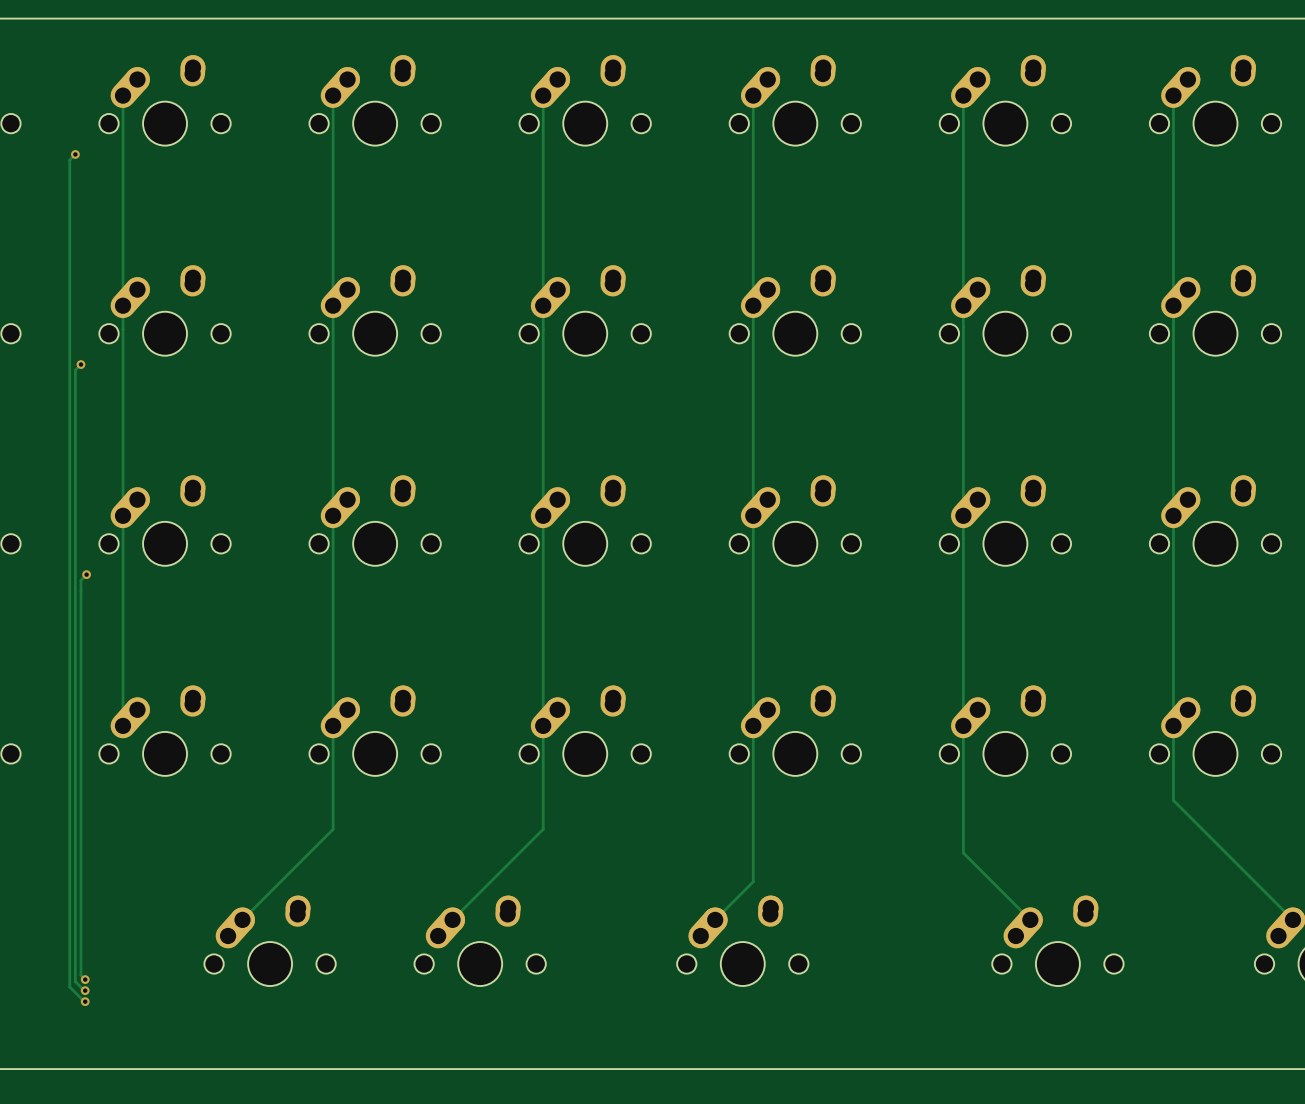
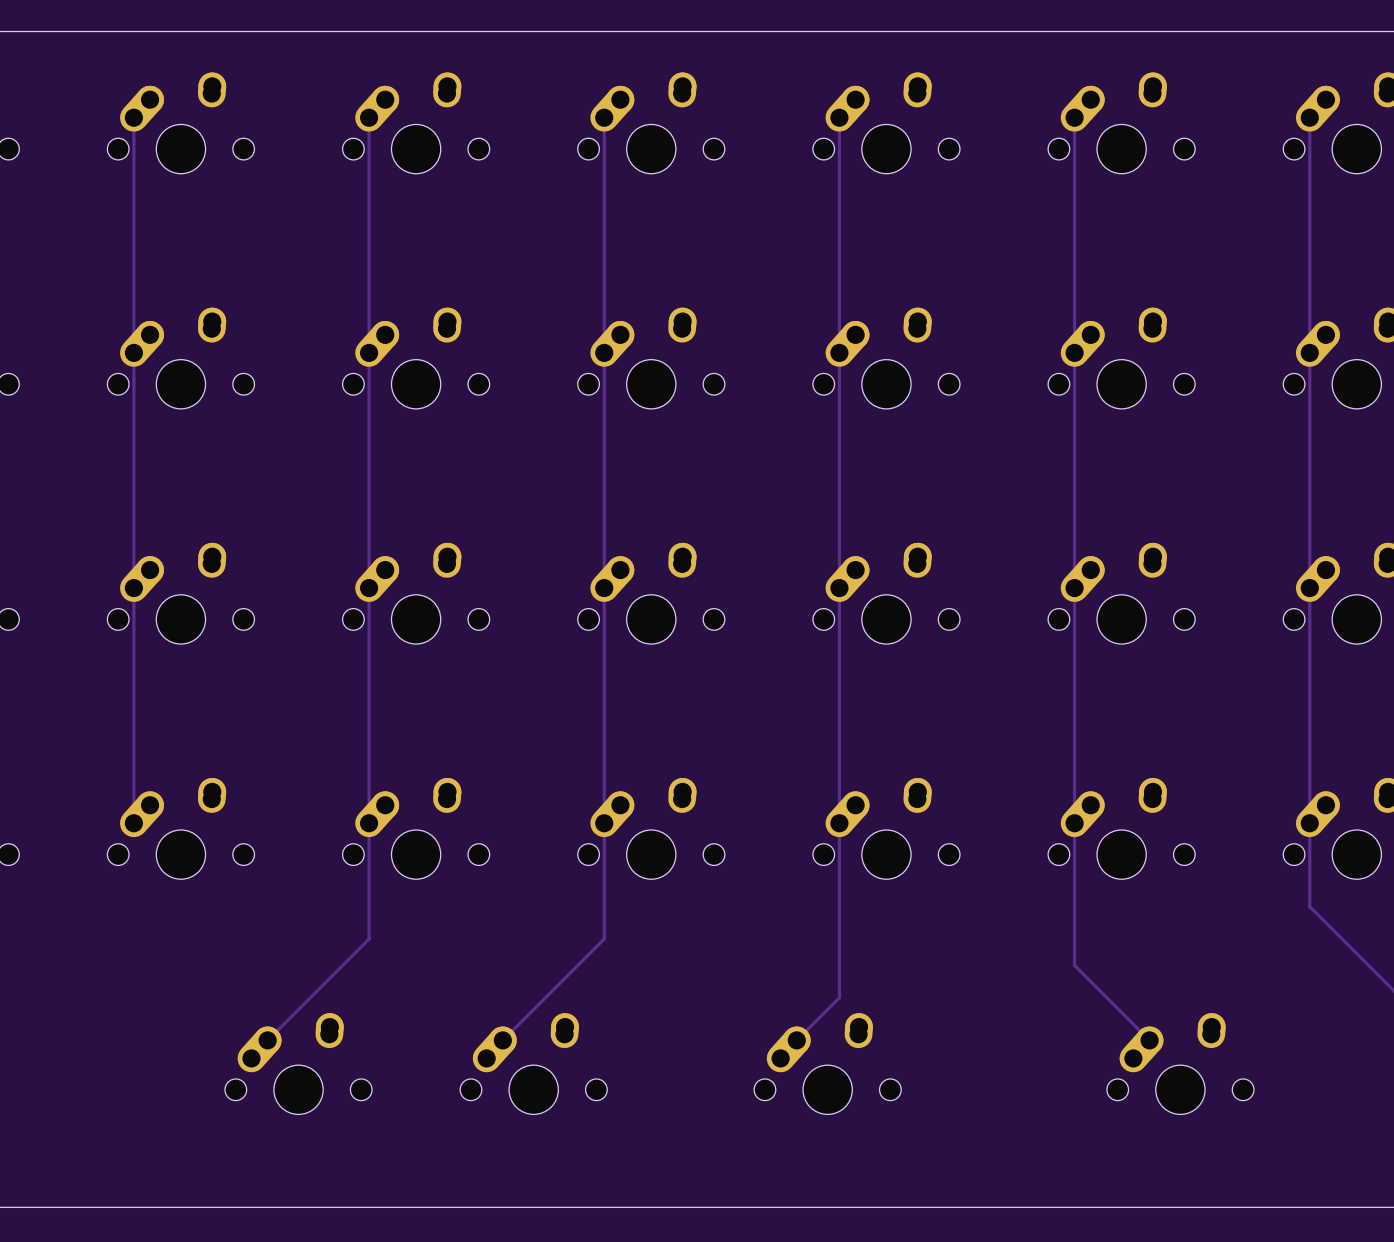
track: (75, 154) (69, 160) (69, 987) (85, 1001) -> none
via: (75, 154) -> none
track: (80, 364) (75, 370) (75, 981) (85, 990) -> none
via: (80, 364) -> none
track: (86, 574) (80, 580) (80, 975) (85, 979) -> none
via: (86, 574) -> none
via: (85, 979) -> none
via: (85, 990) -> none
via: (85, 1001) -> none

